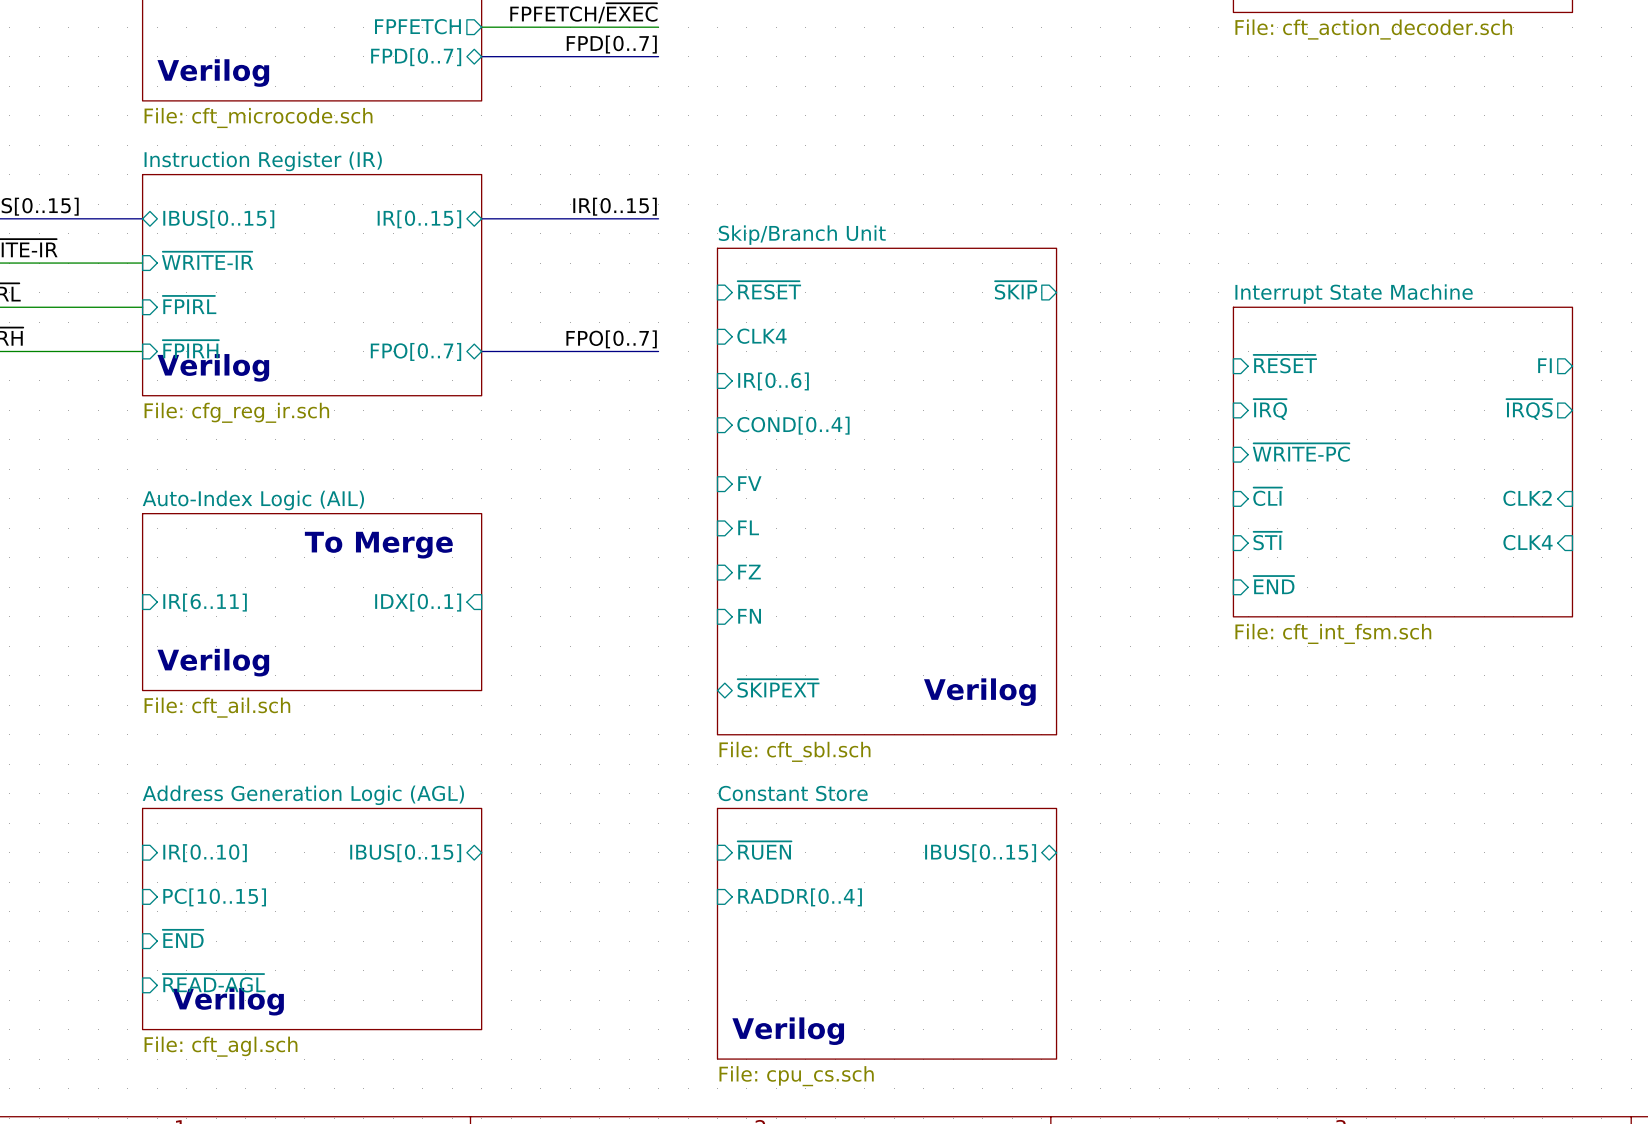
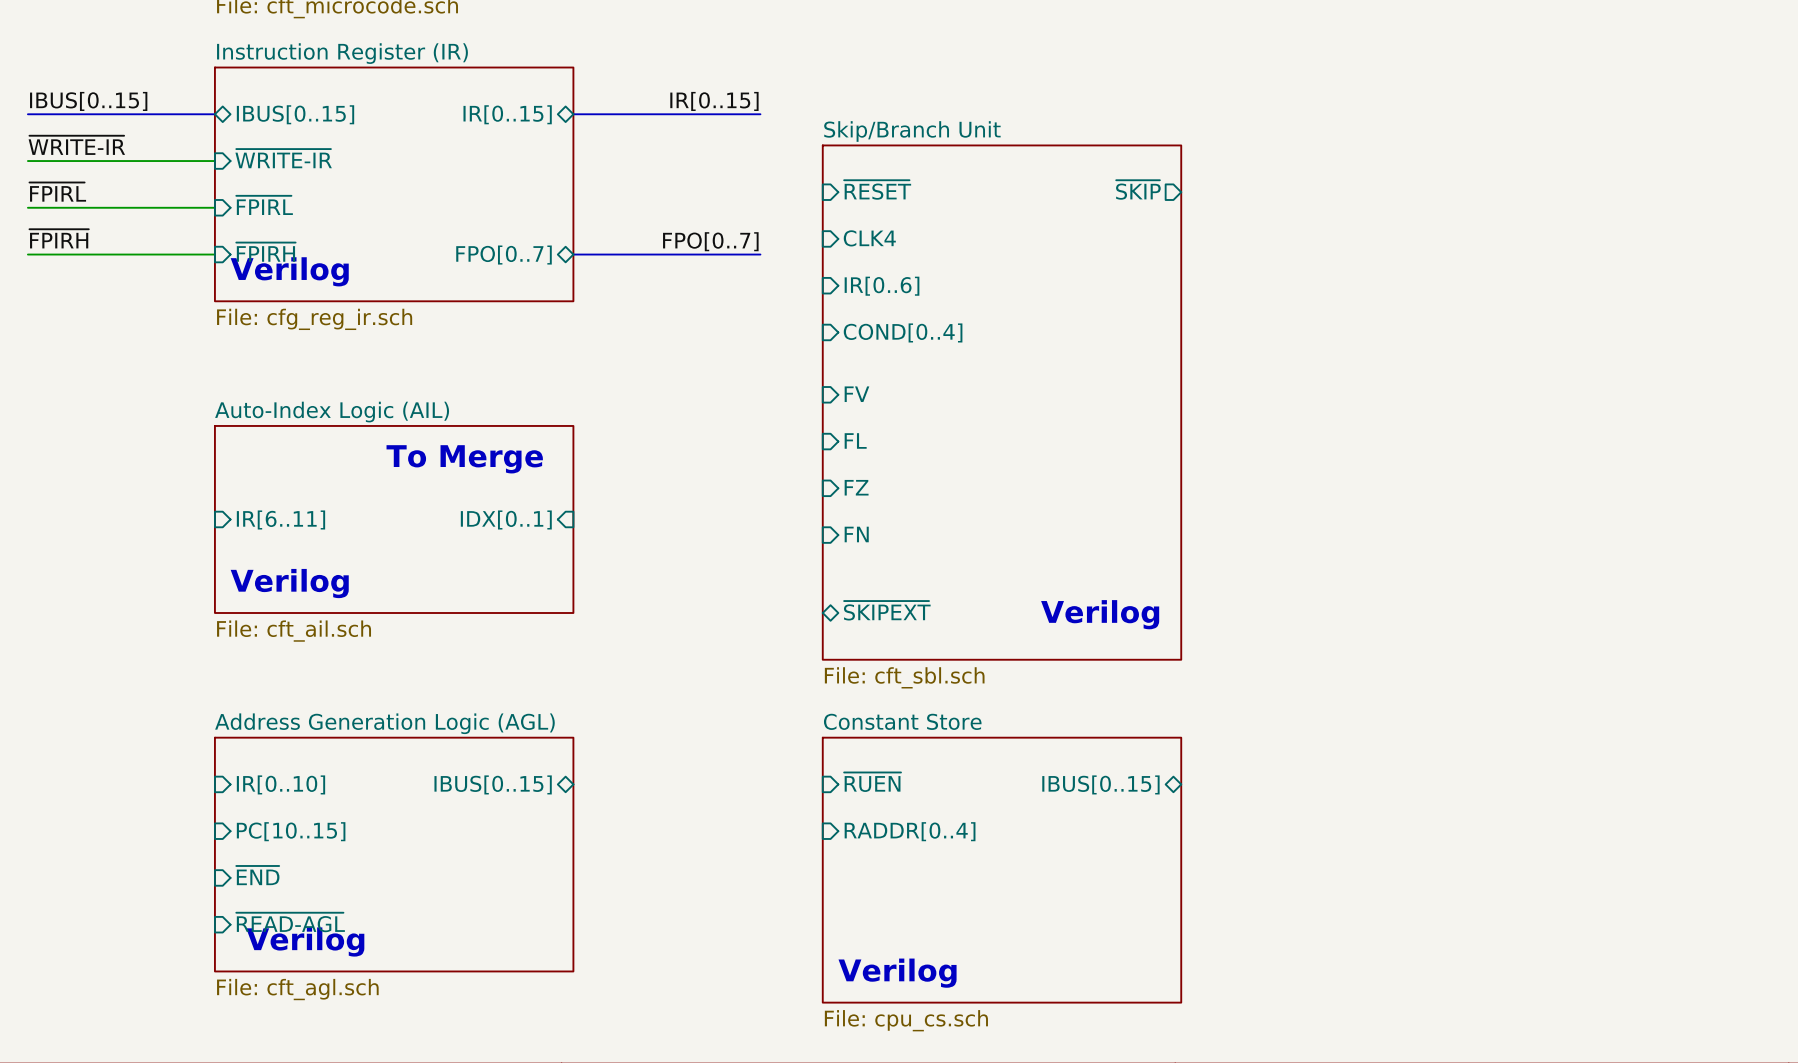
sheet pin: ~{RESET} (1285, 364) -> none
sheet pin: FI (1544, 365) -> none
sheet pin: ~{IRQ} (1270, 409) -> none
sheet pin: ~{IRQS} (1529, 409) -> none
sheet pin: ~{WRITE-PC} (1301, 452) -> none
sheet Interrupt State Machine: File: cft_int_fsm.sch (1402, 462) -> none
sheet pin: ~{CLI} (1267, 496) -> none
sheet pin: CLK2 (1527, 498) -> none
sheet pin: ~{STI} (1267, 541) -> none
sheet pin: CLK4 (1528, 542) -> none
sheet pin: ~{END} (1274, 585) -> none

